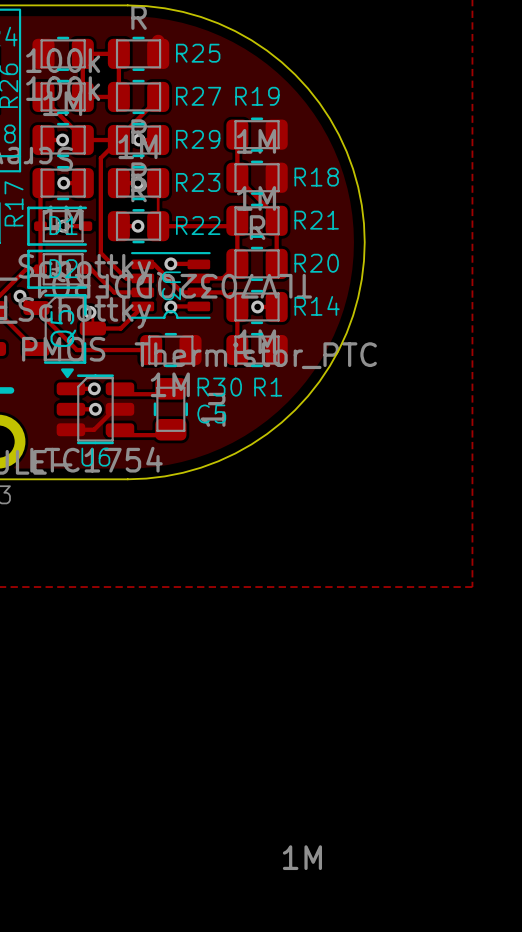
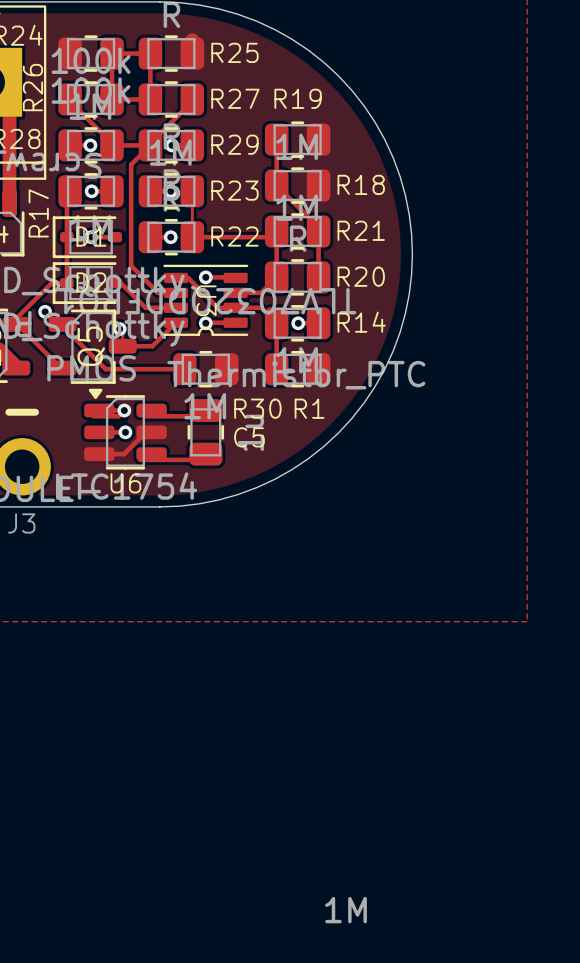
track: none -> (119, 415) (93, 416)

